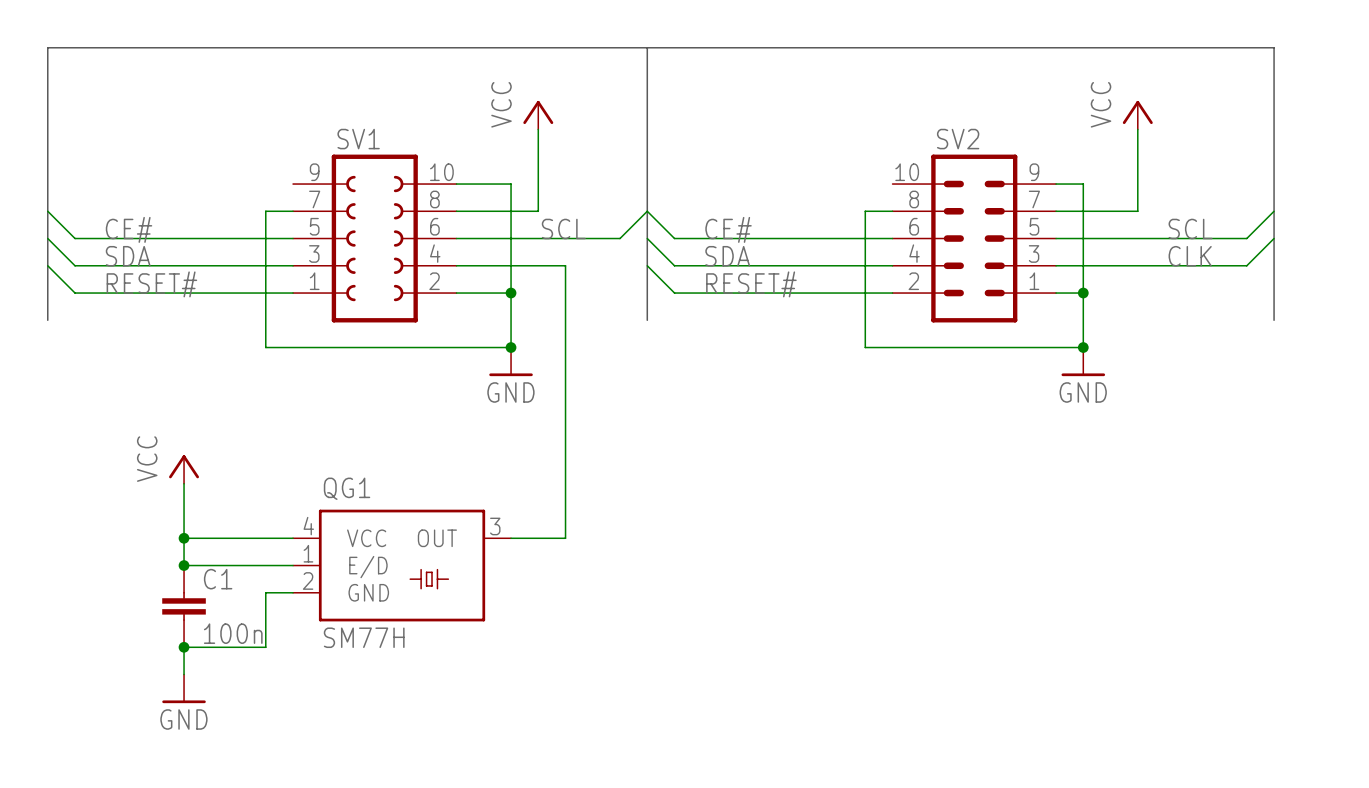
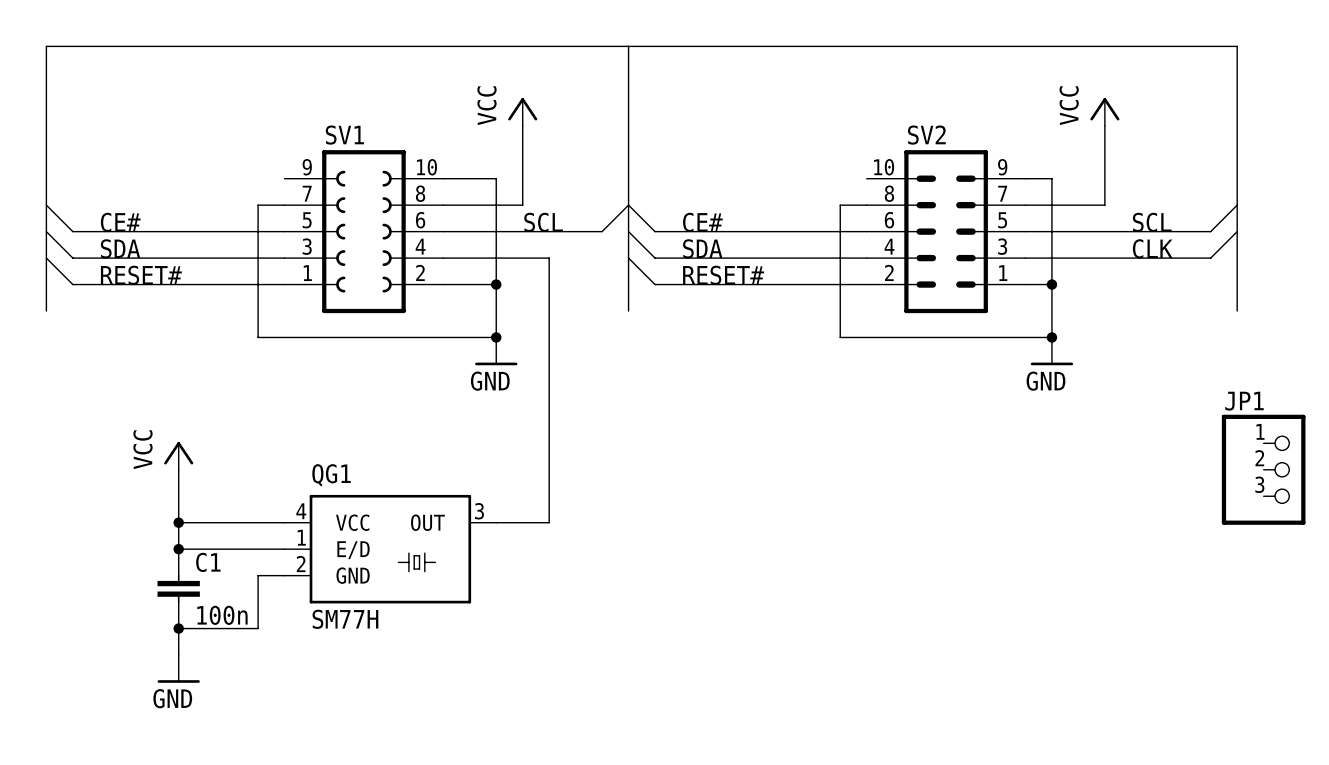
JP1: none -> (1263, 469)

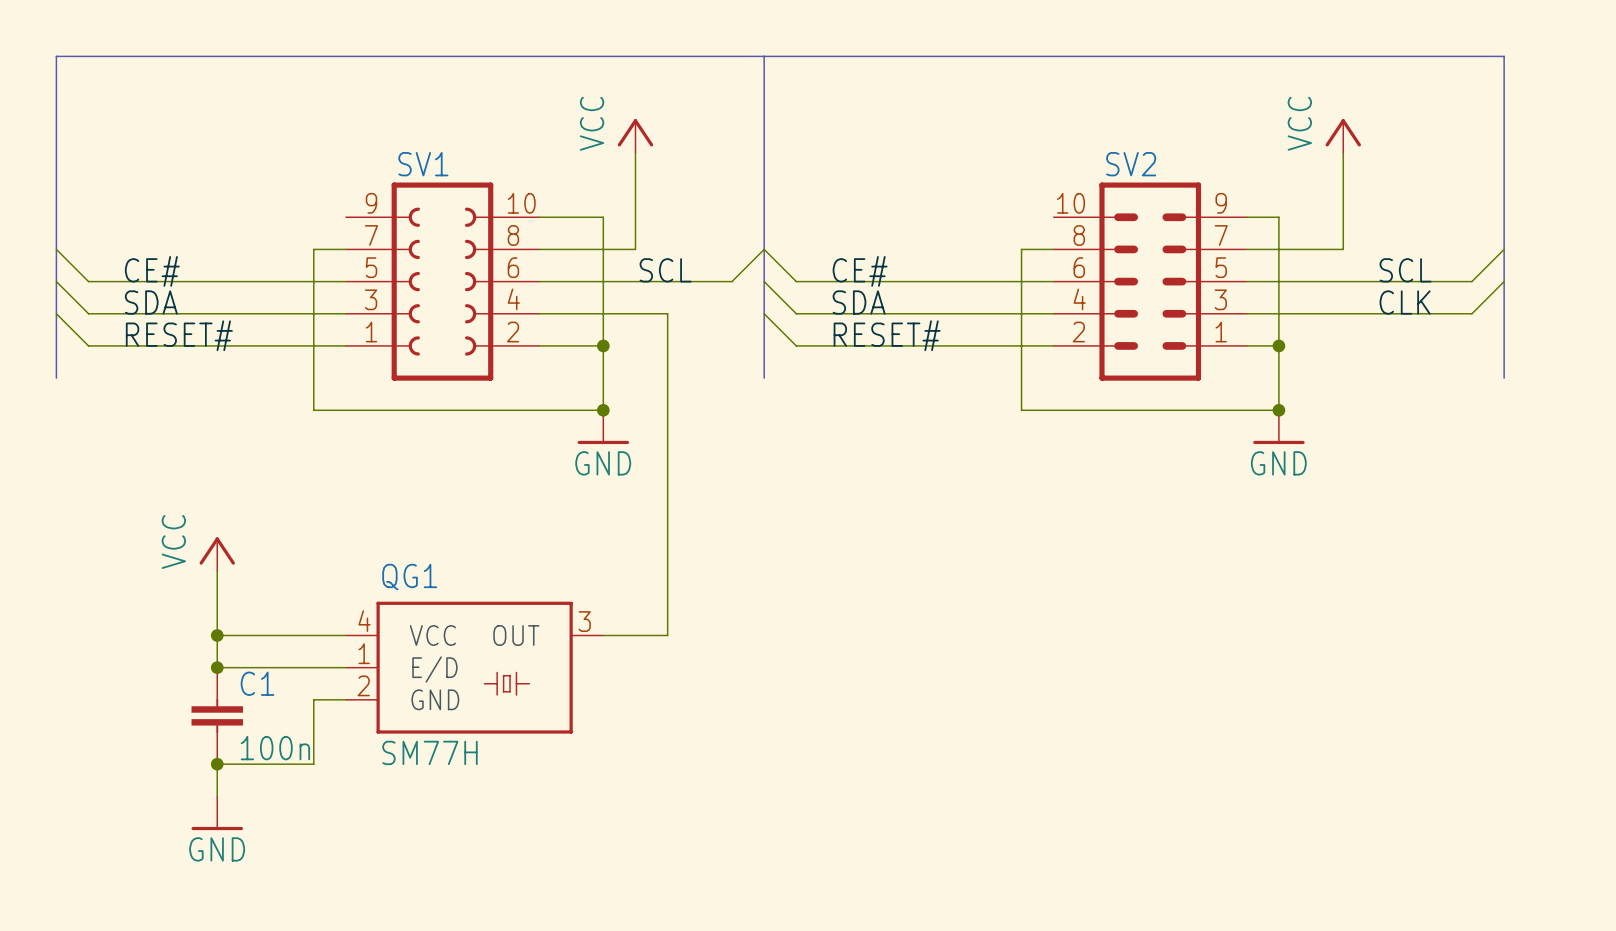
JP1: (1263, 469) -> none

